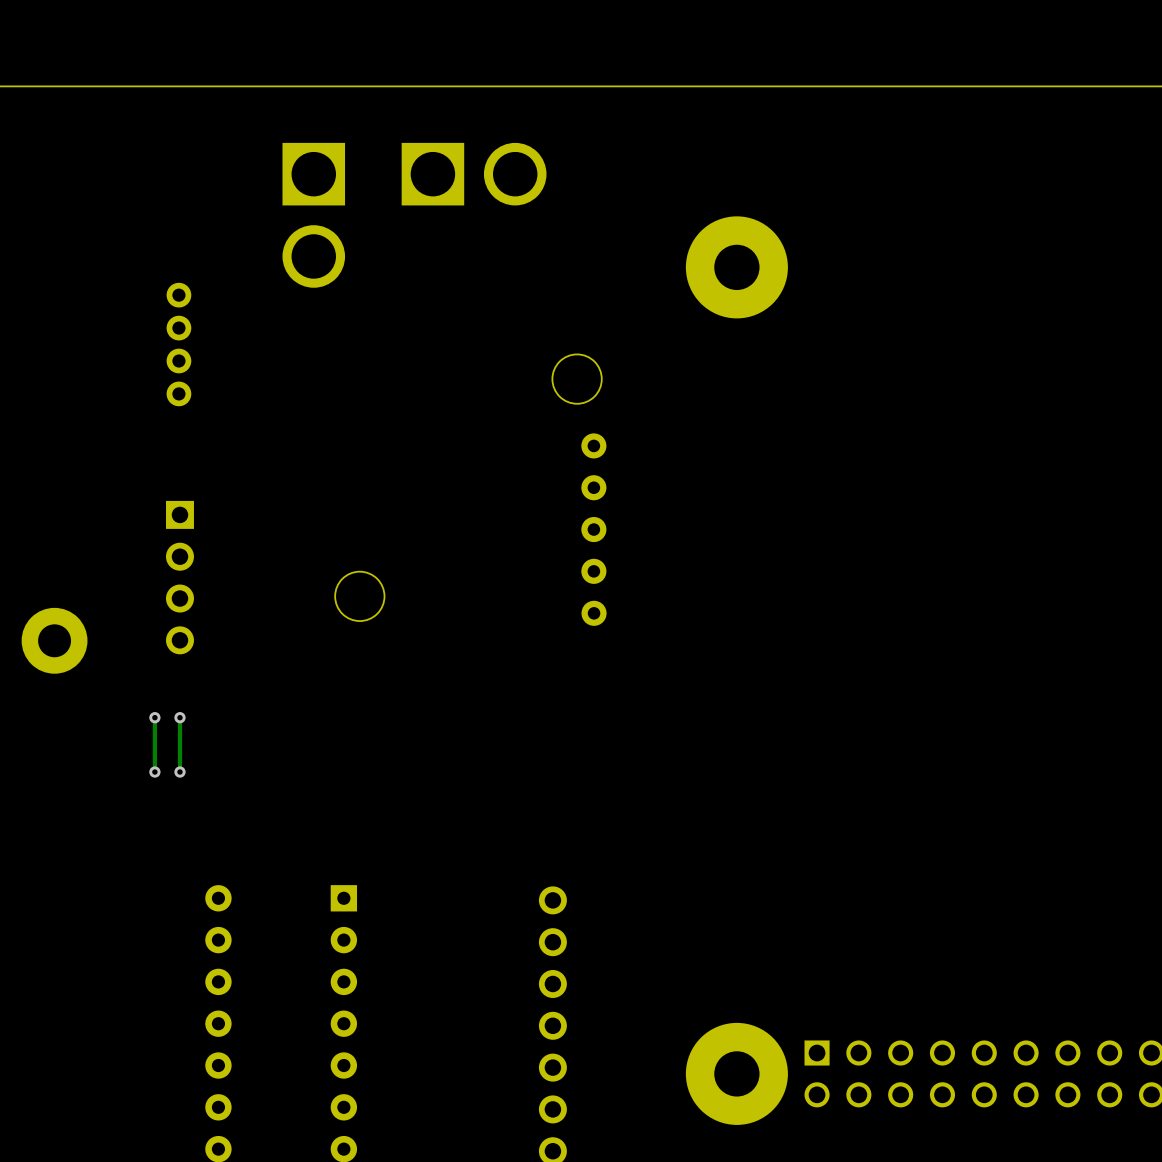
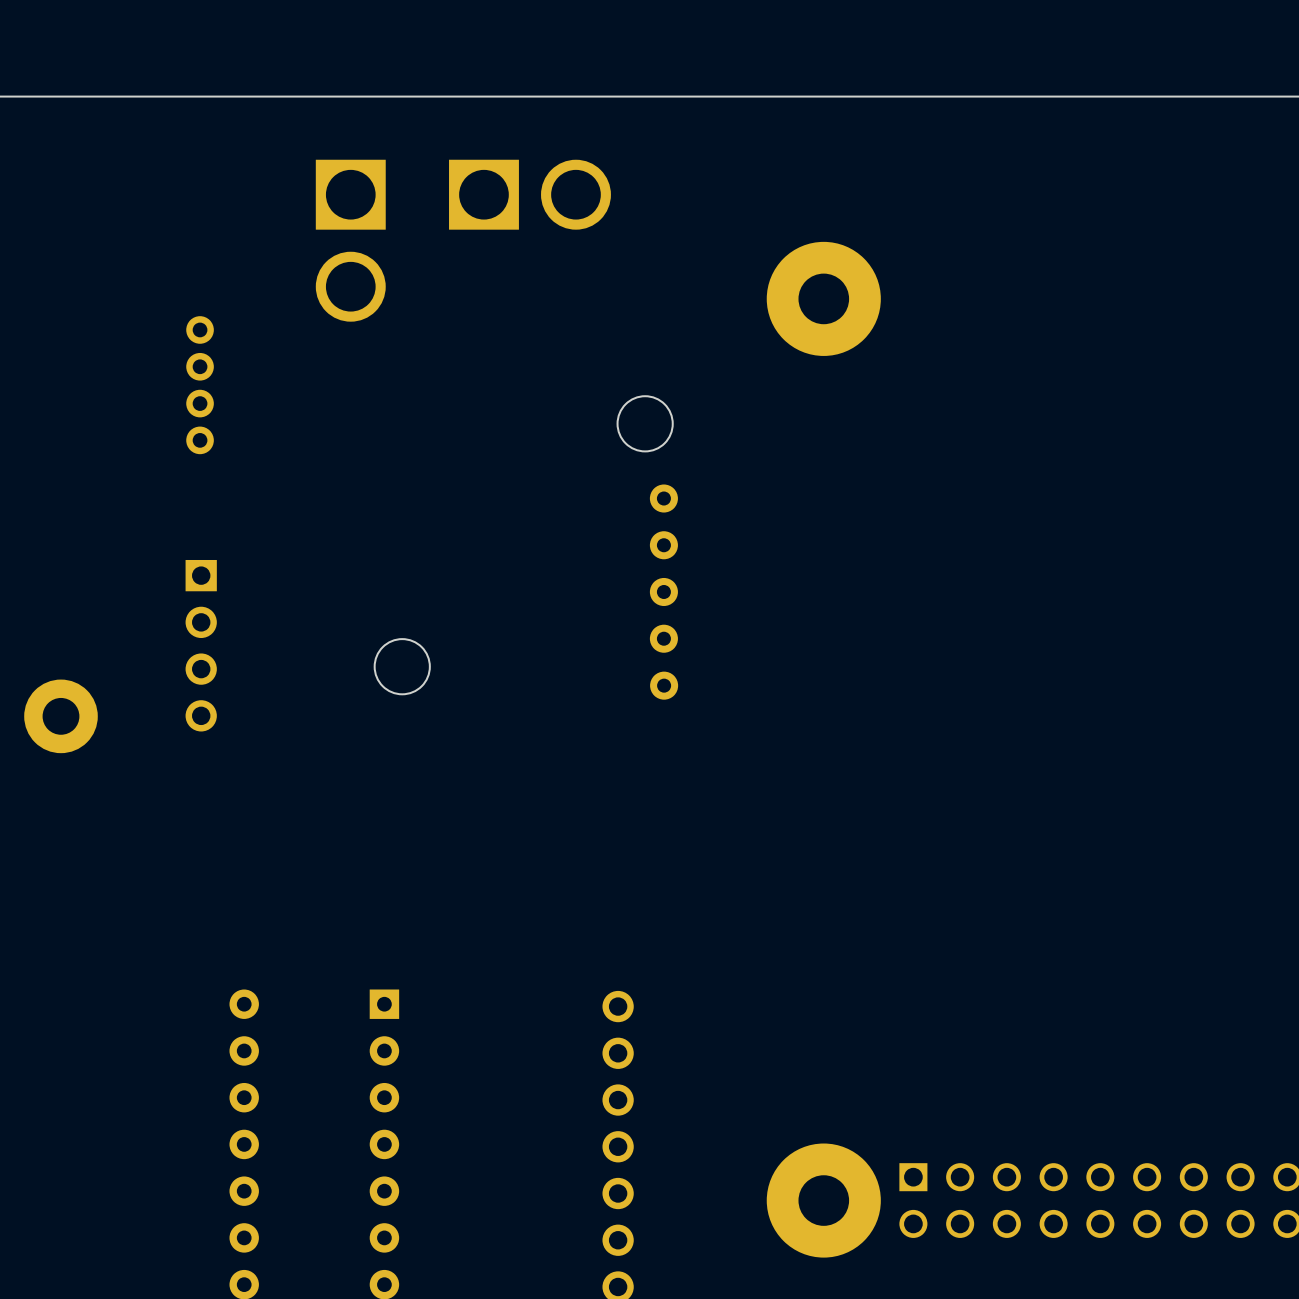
track: (154, 717) (154, 772) -> none
via: (154, 717) -> none
track: (179, 717) (179, 772) -> none
via: (179, 717) -> none
via: (154, 772) -> none
via: (179, 772) -> none

